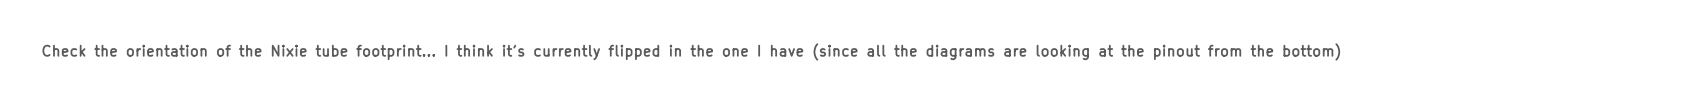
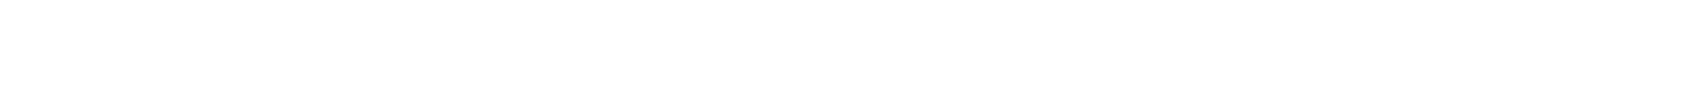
text: Check the orientation of the Nixie tube footprint... I think it's currently flipped in the one I have (since all the diagrams are looking at the pinout from the bottom) (691, 51) -> none

